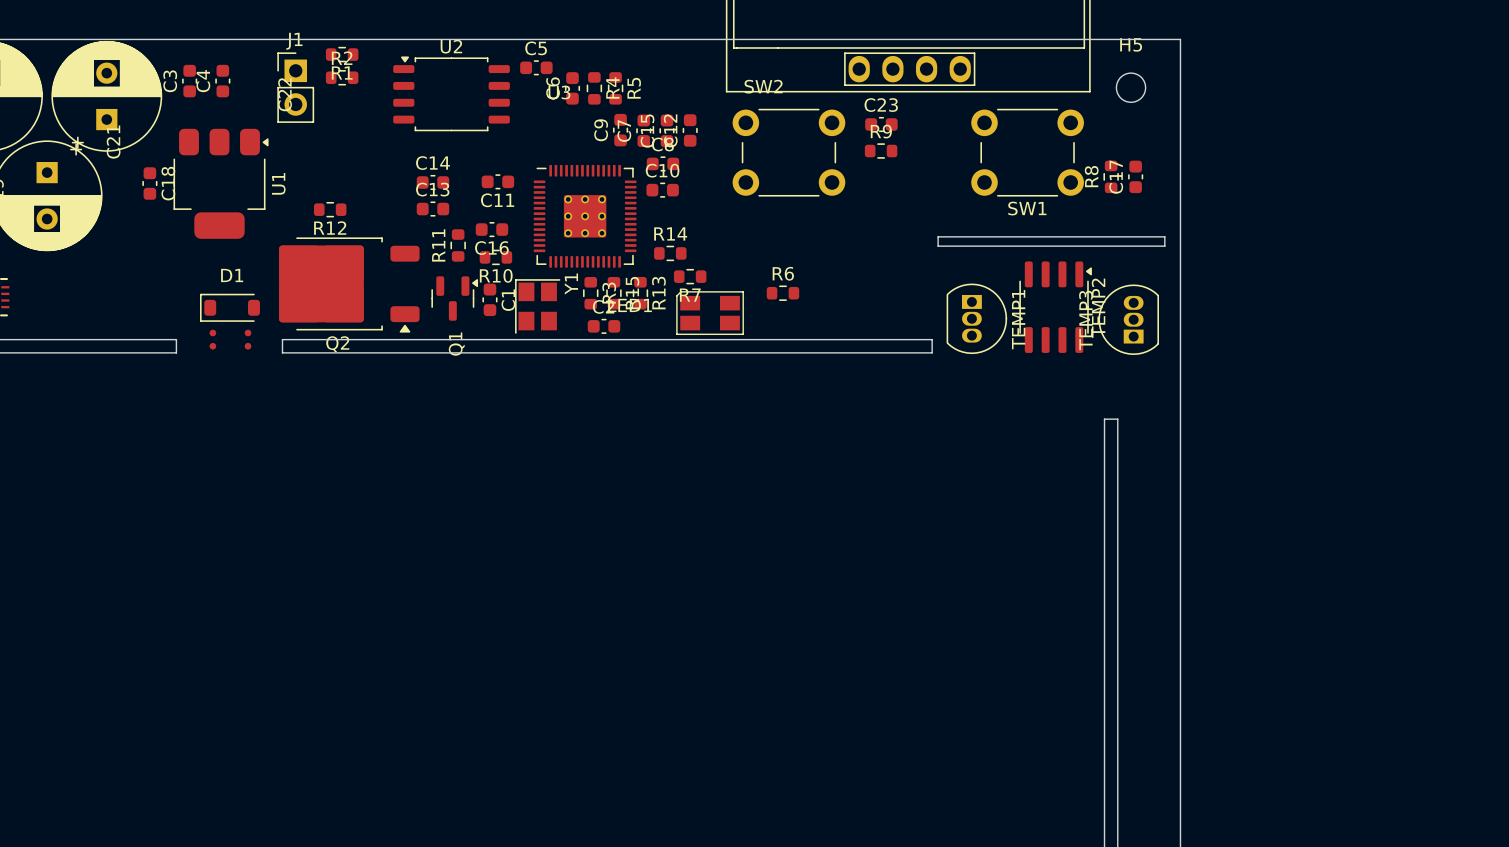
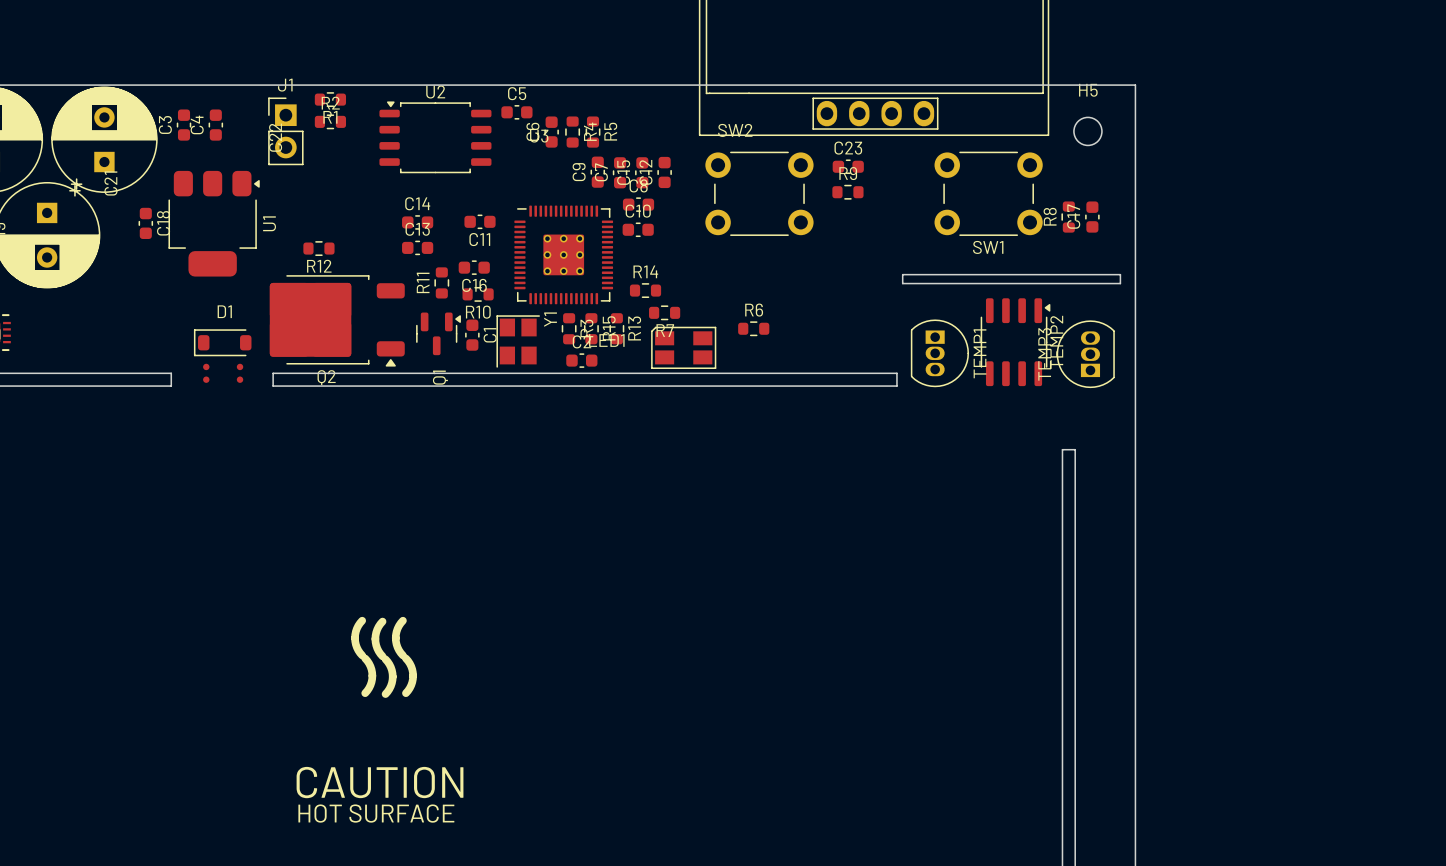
line: none -> (362, 620) (356, 628) (355, 638) (356, 647) (362, 655)
line: none -> (402, 620) (397, 628) (395, 638) (397, 647) (402, 655)
line: none -> (382, 621) (377, 629) (375, 638) (377, 648) (382, 656)
line: none -> (365, 658) (370, 666) (372, 675) (370, 685) (365, 693)
line: none -> (405, 658) (411, 666) (413, 675) (411, 685) (405, 693)
line: none -> (385, 659) (390, 667) (392, 676) (390, 686) (385, 694)
text: none -> CAUTION (380, 782)
text: none -> HOT SURFACE (376, 813)

